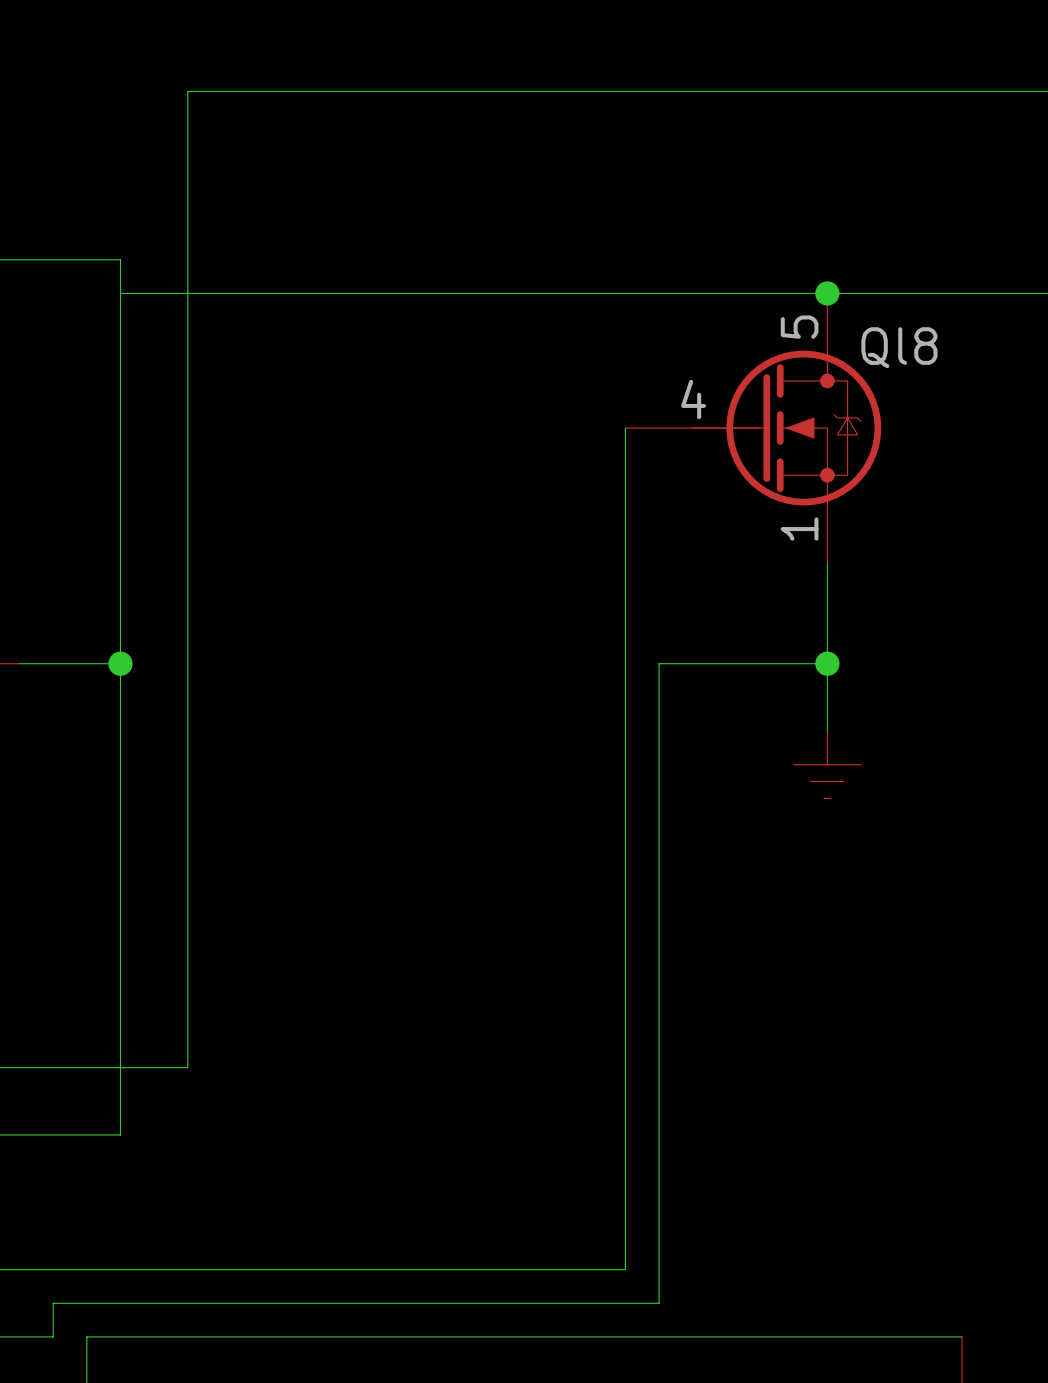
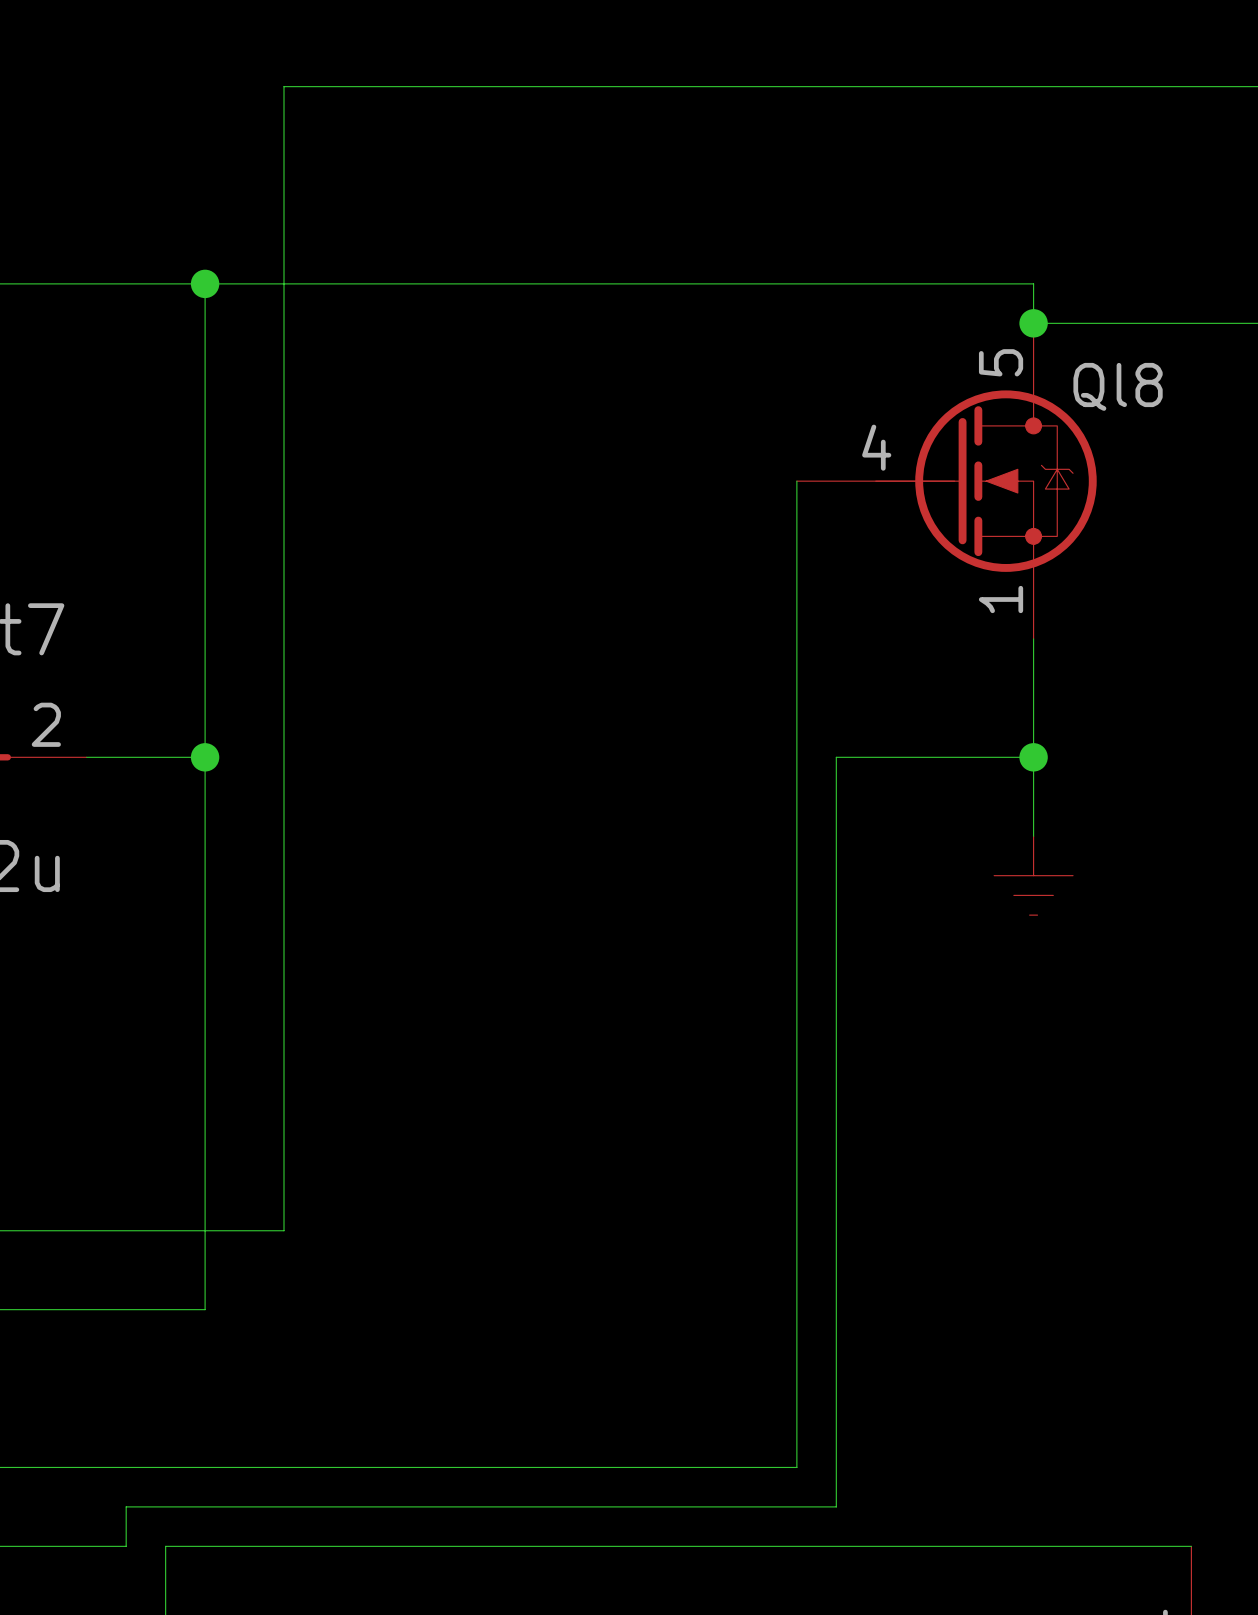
junction: none -> (205, 283)
wire: (120, 293) (827, 293) -> (205, 283) (1033, 283) (1033, 323)

